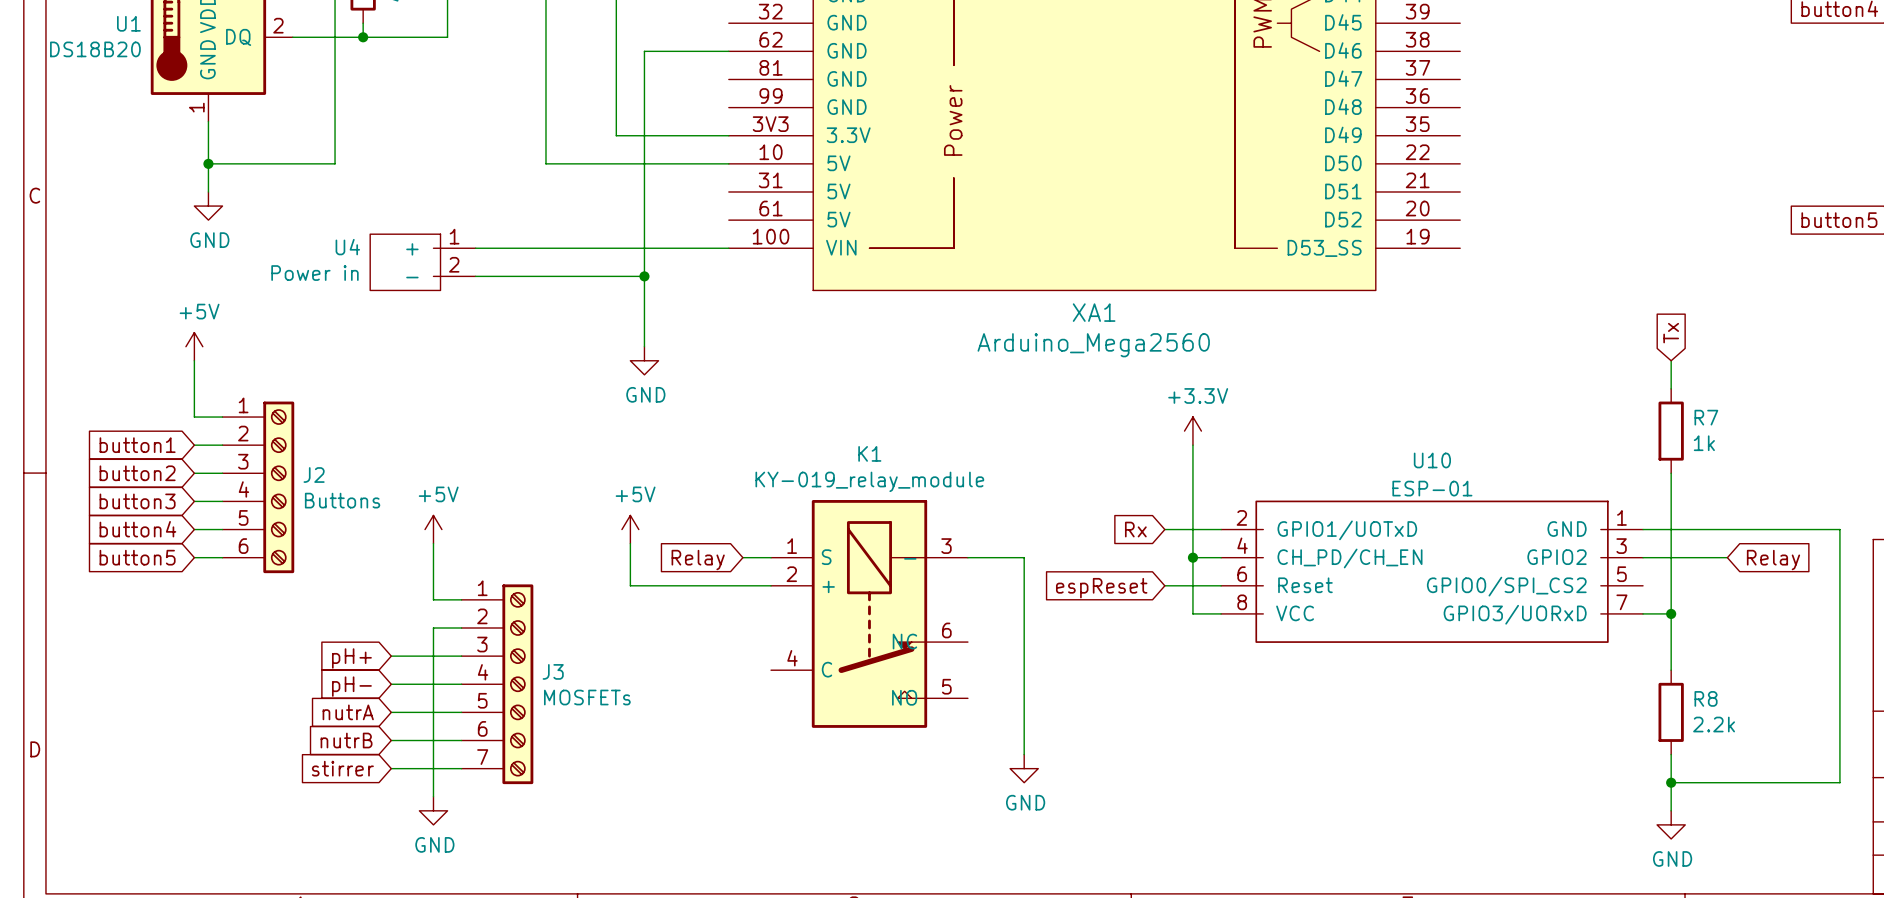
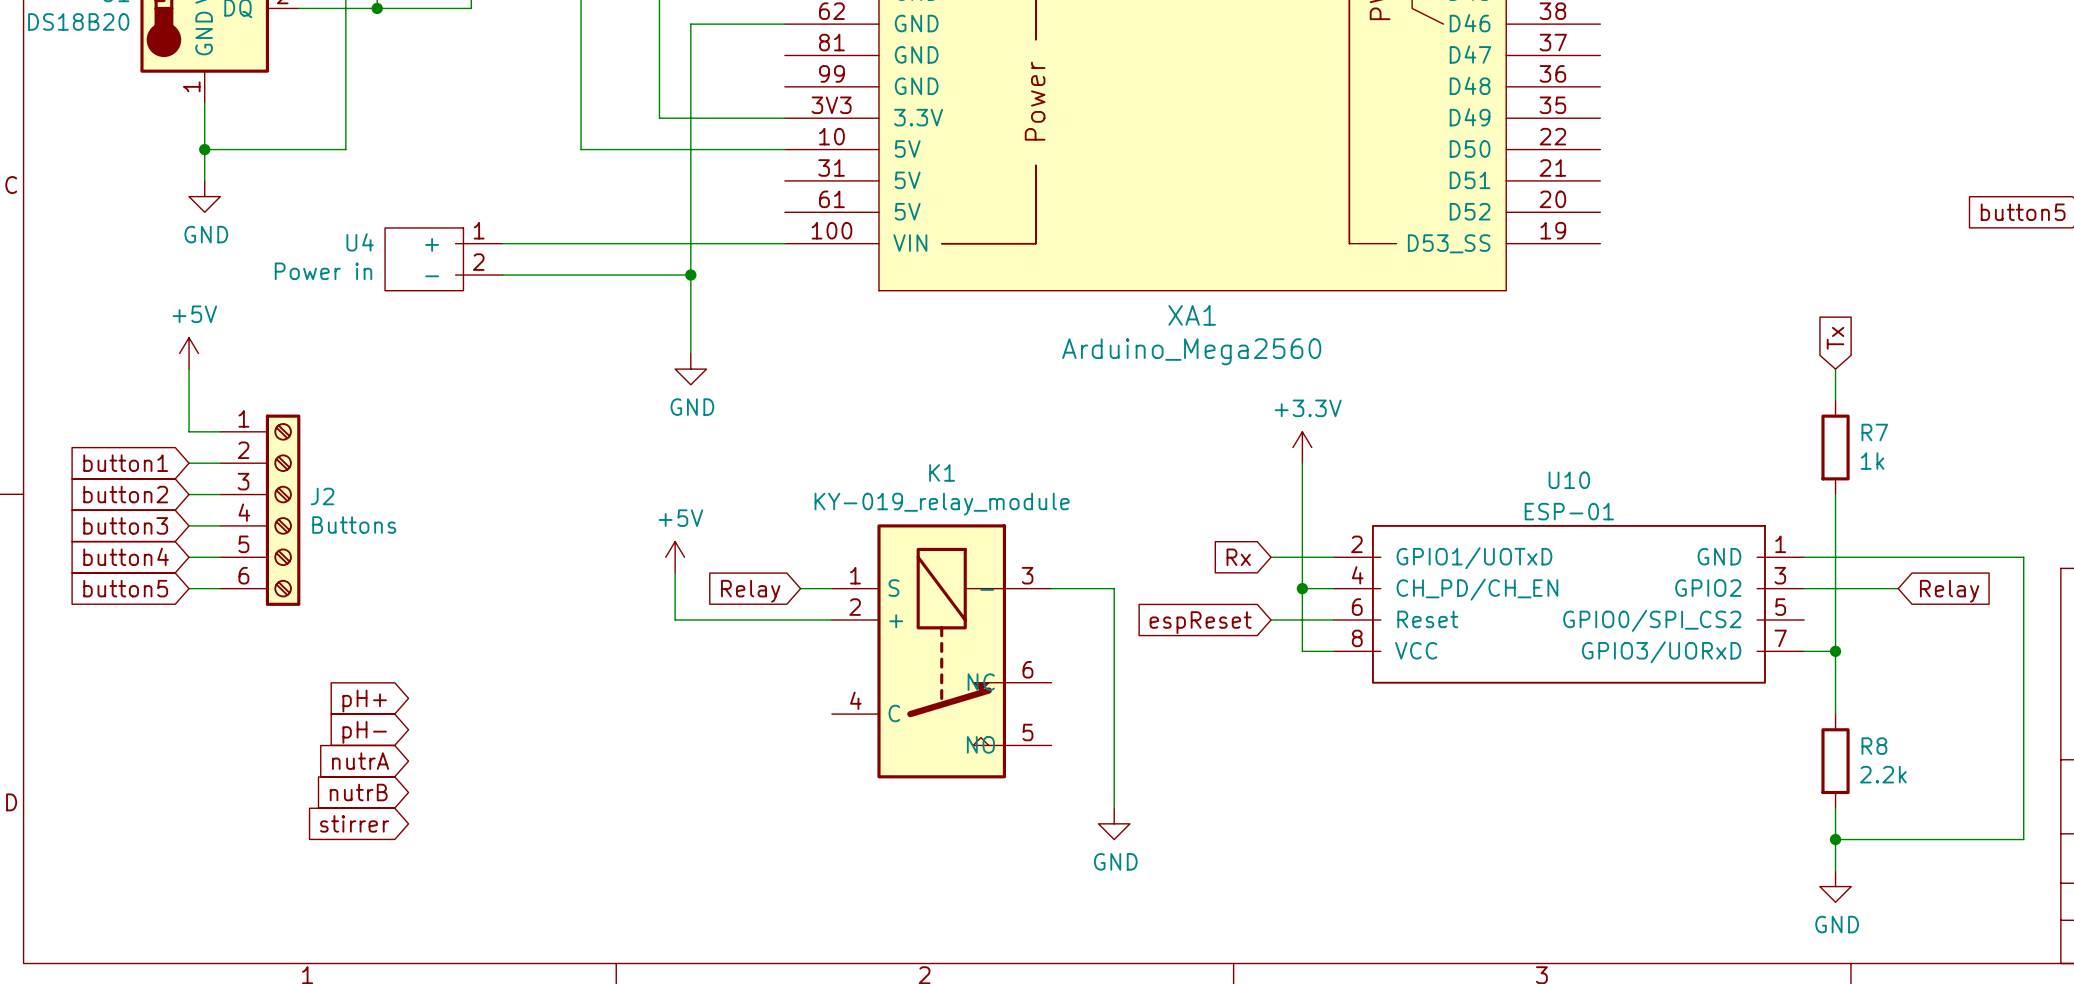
power symbol: +5V (433, 529) -> none
wire: (433, 543) (433, 599) (461, 599) -> none
wire: (461, 628) (433, 628) (433, 796) -> none
wire: (391, 656) (461, 656) -> none
wire: (391, 684) (461, 684) -> none
J3: MOSFETs (497, 684) -> none
wire: (391, 712) (461, 712) -> none
wire: (391, 740) (461, 740) -> none
wire: (391, 768) (461, 768) -> none
power symbol: GND (433, 810) -> none

